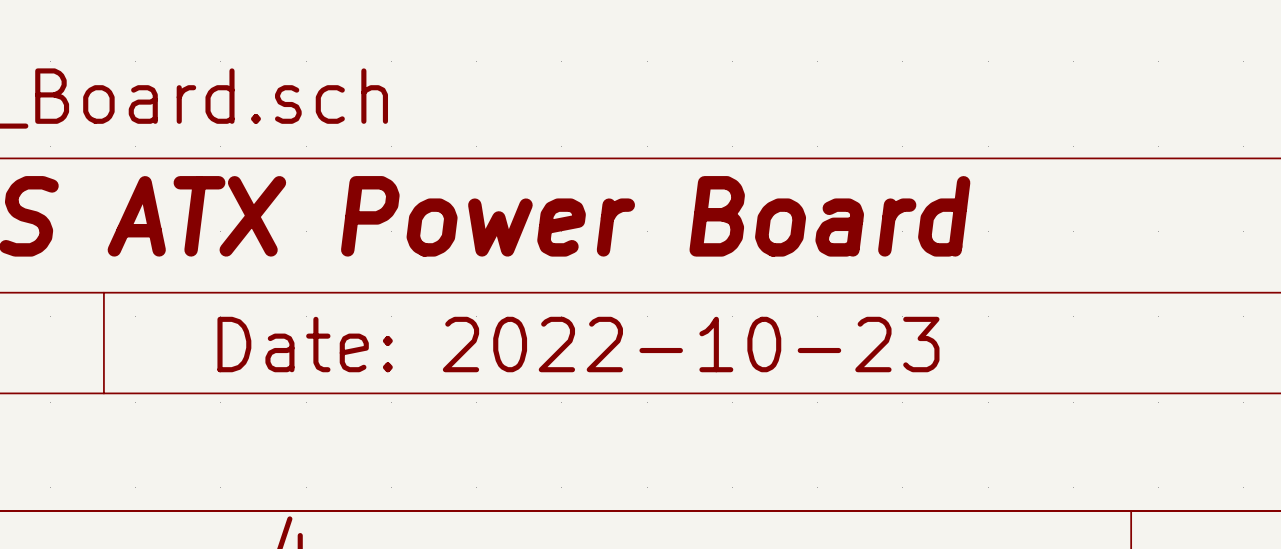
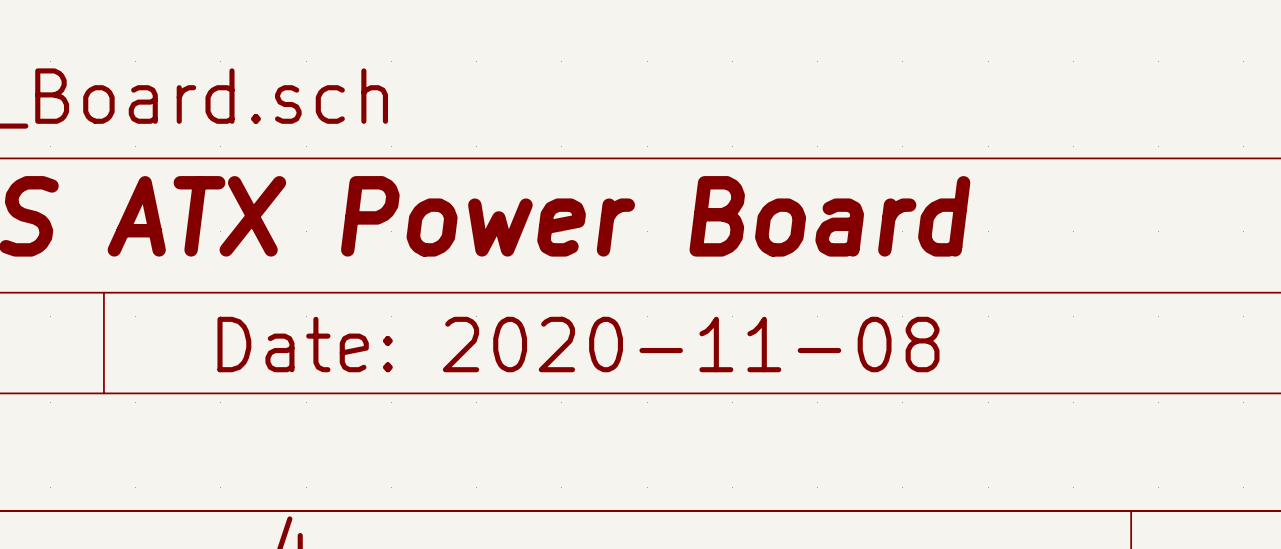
title block: Date: 2022-10-23 (578, 344) -> Date: 2020-11-08 (578, 344)

